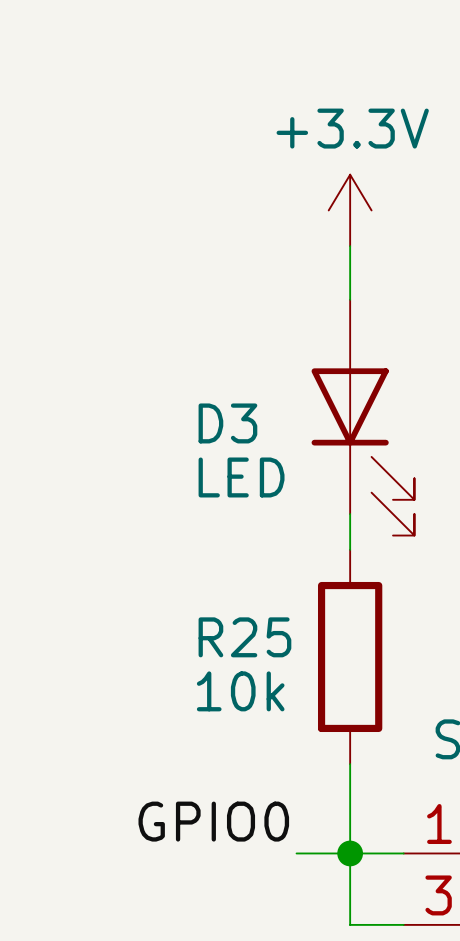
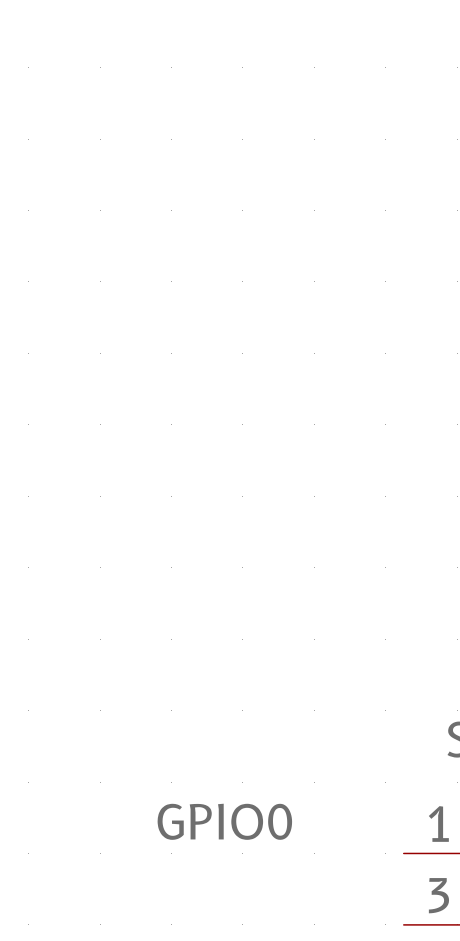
power symbol: +3.3V (350, 210) -> none
wire: (350, 246) (350, 299) -> none
D3: LED (363, 417) -> none
wire: (350, 514) (350, 549) -> none
R25: 10k (350, 656) -> none
wire: (350, 764) (350, 924) (403, 924) -> none
wire: (296, 853) (403, 853) -> none
junction: (350, 853) -> none

